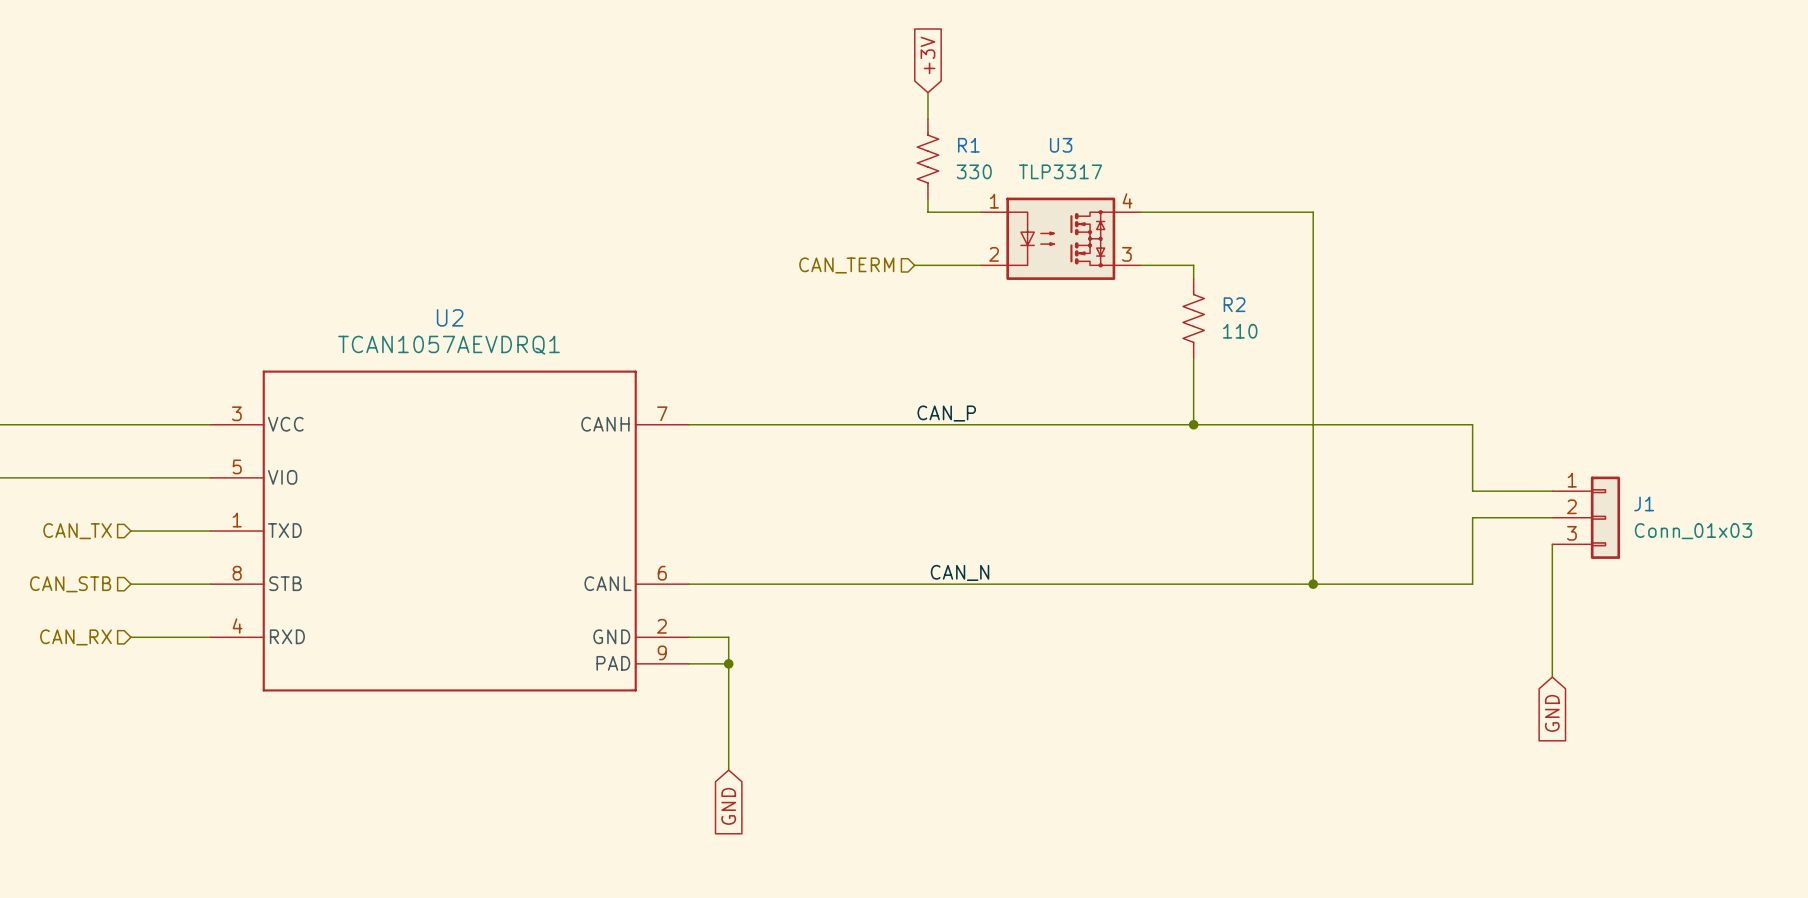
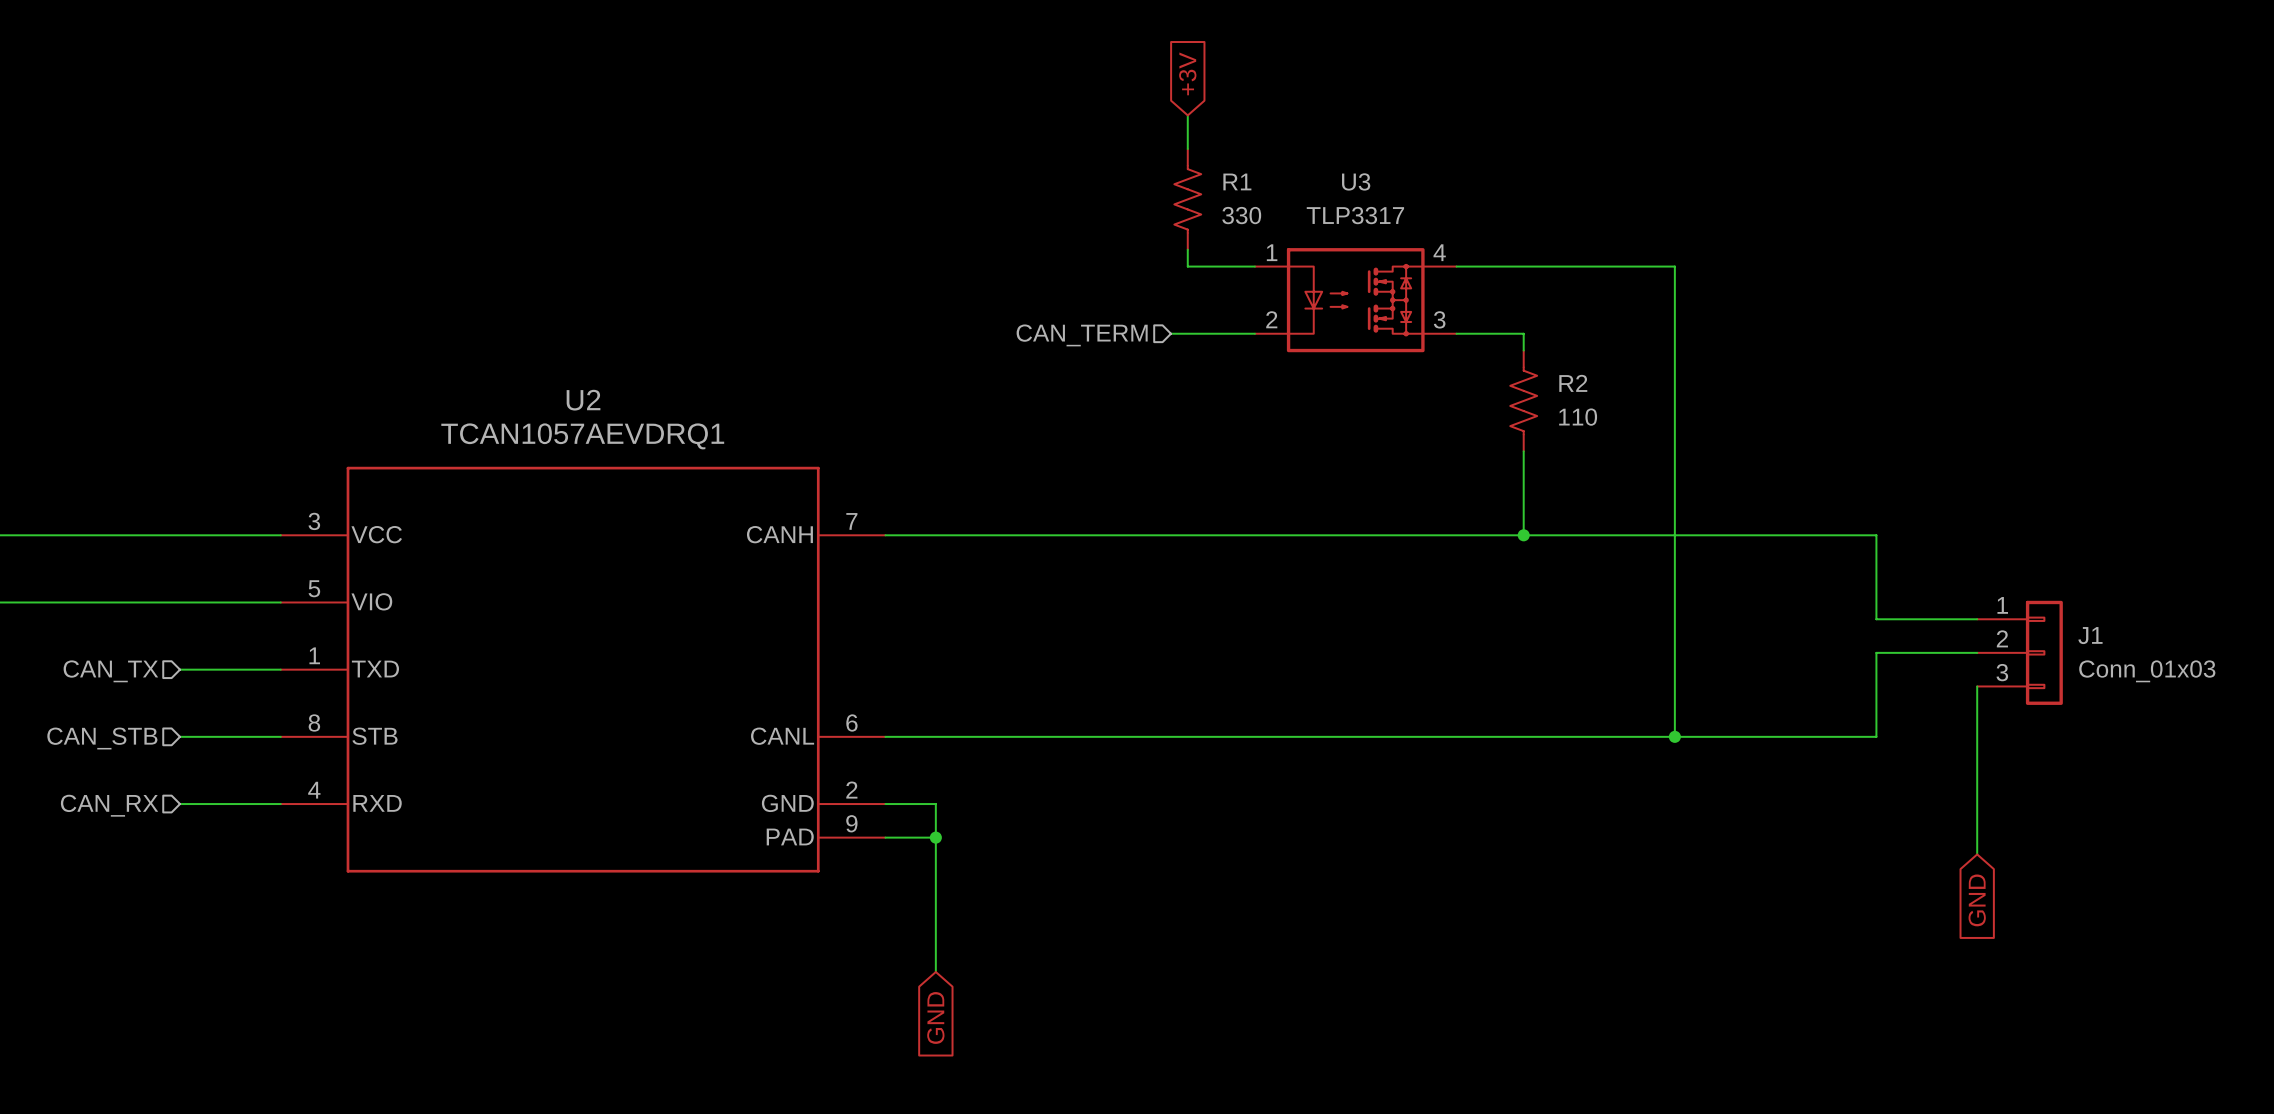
label: CAN_P (946, 413) -> none
label: CAN_N (960, 572) -> none

